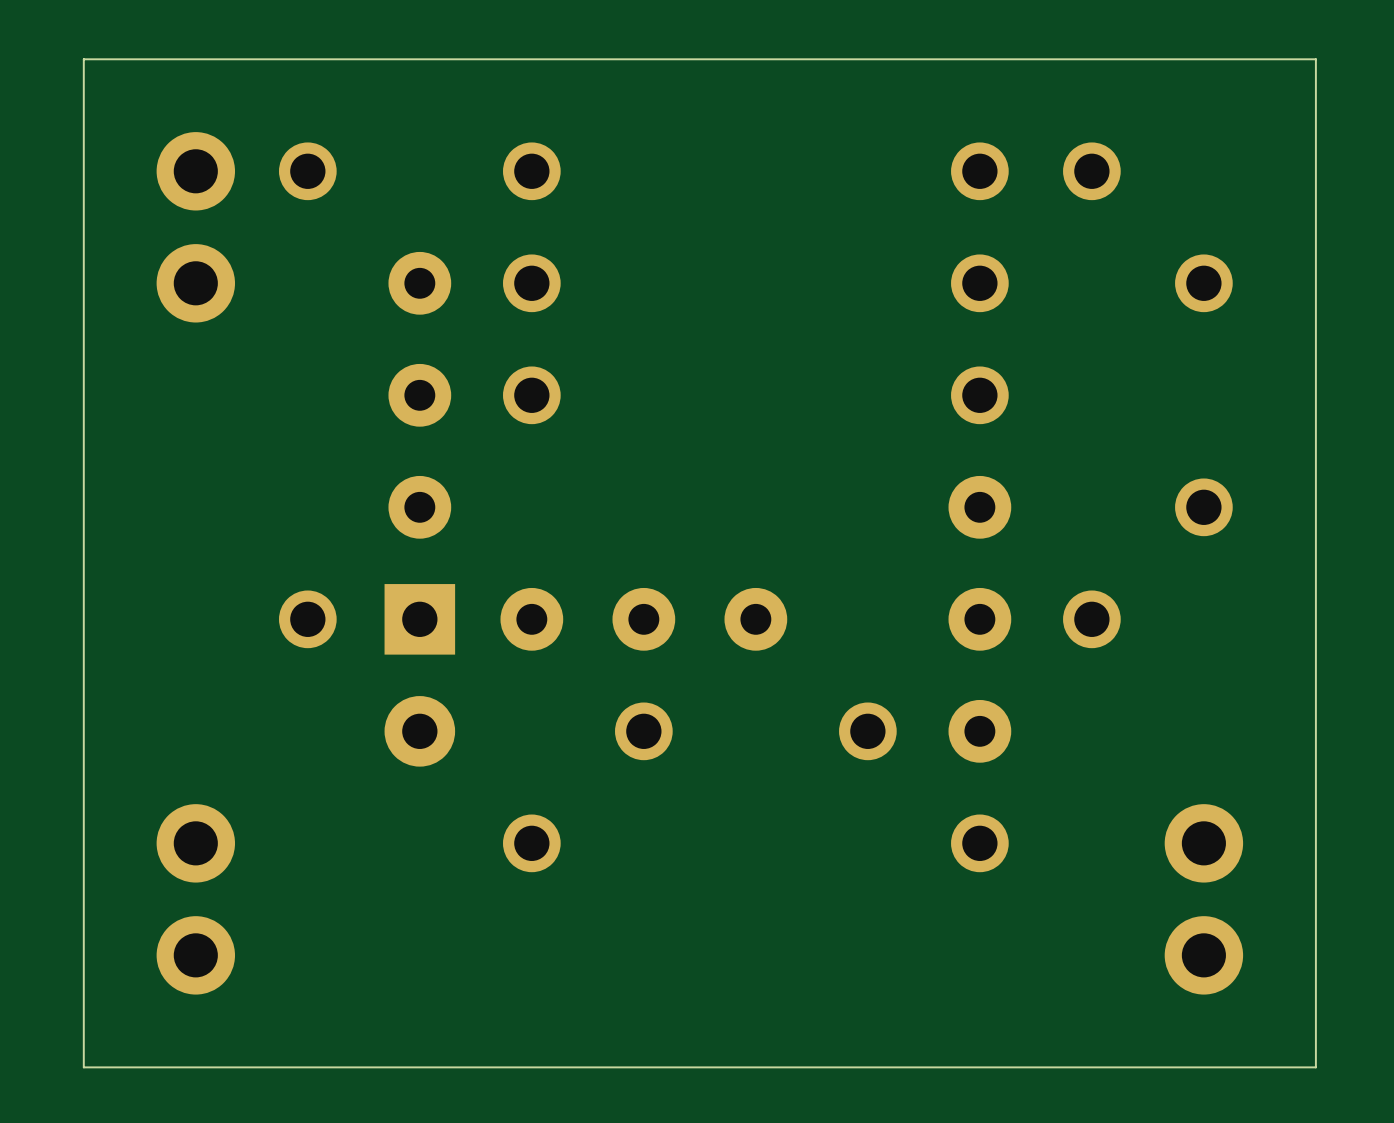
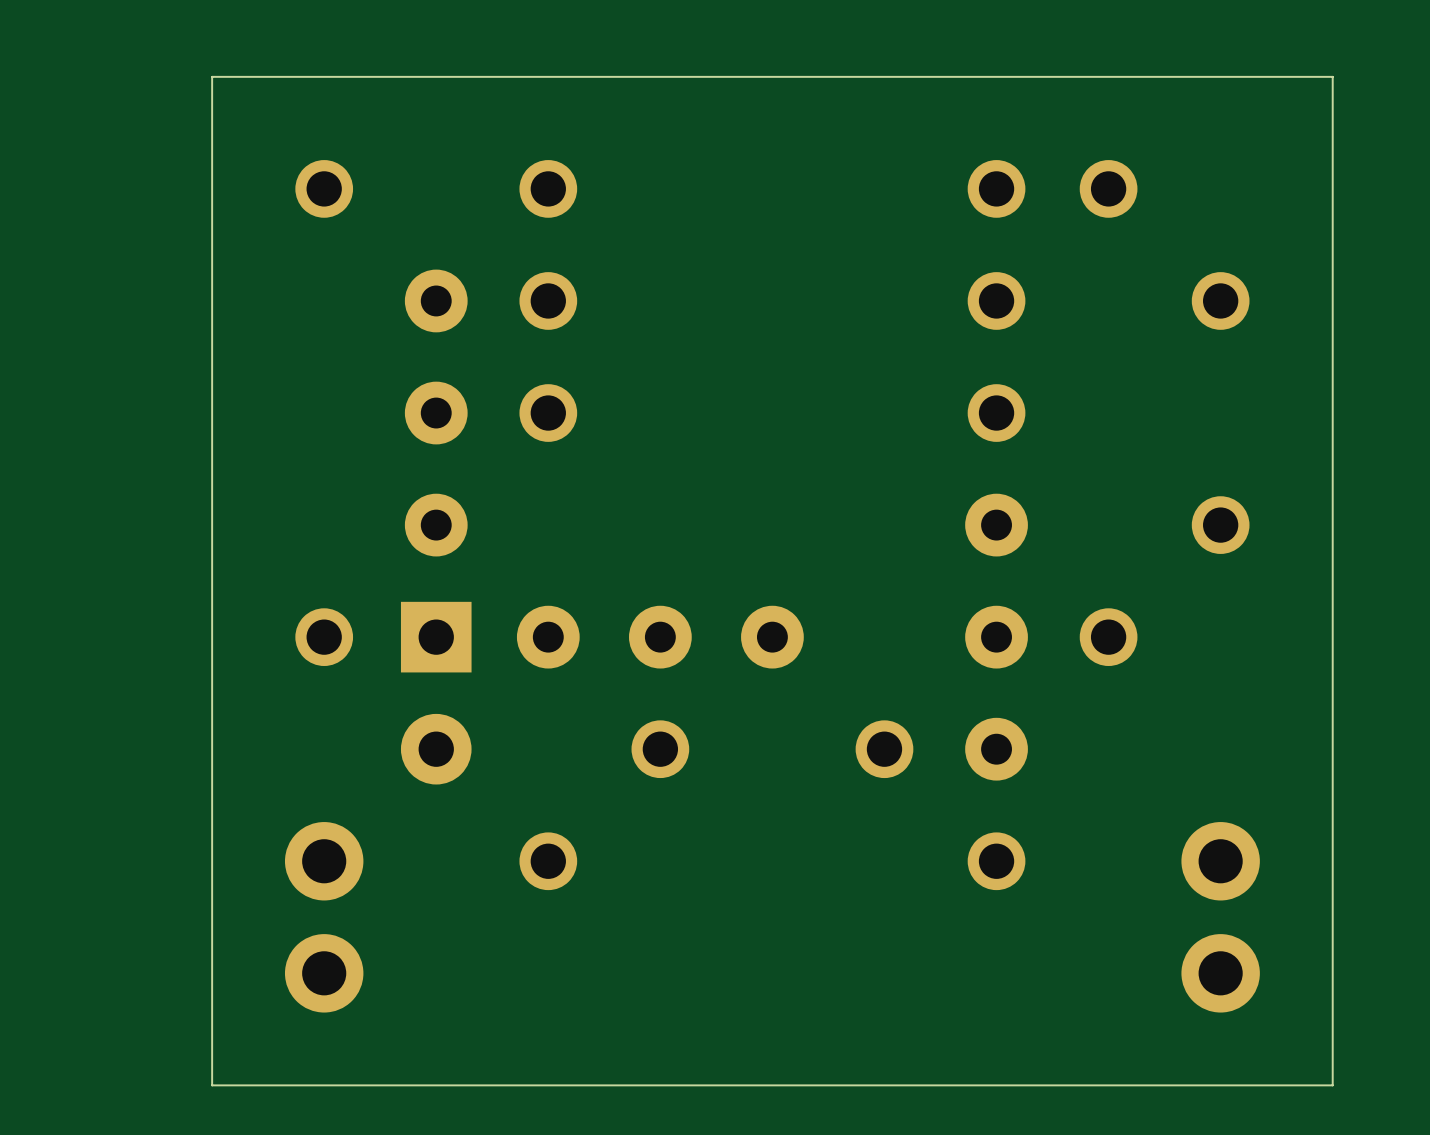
board edge: (195, 59) (83, 59) (83, 1067) (195, 1067) -> (212, 76) (212, 1085)
part: (195, 227) -> none
part position: (195, 899) -> (324, 917)

